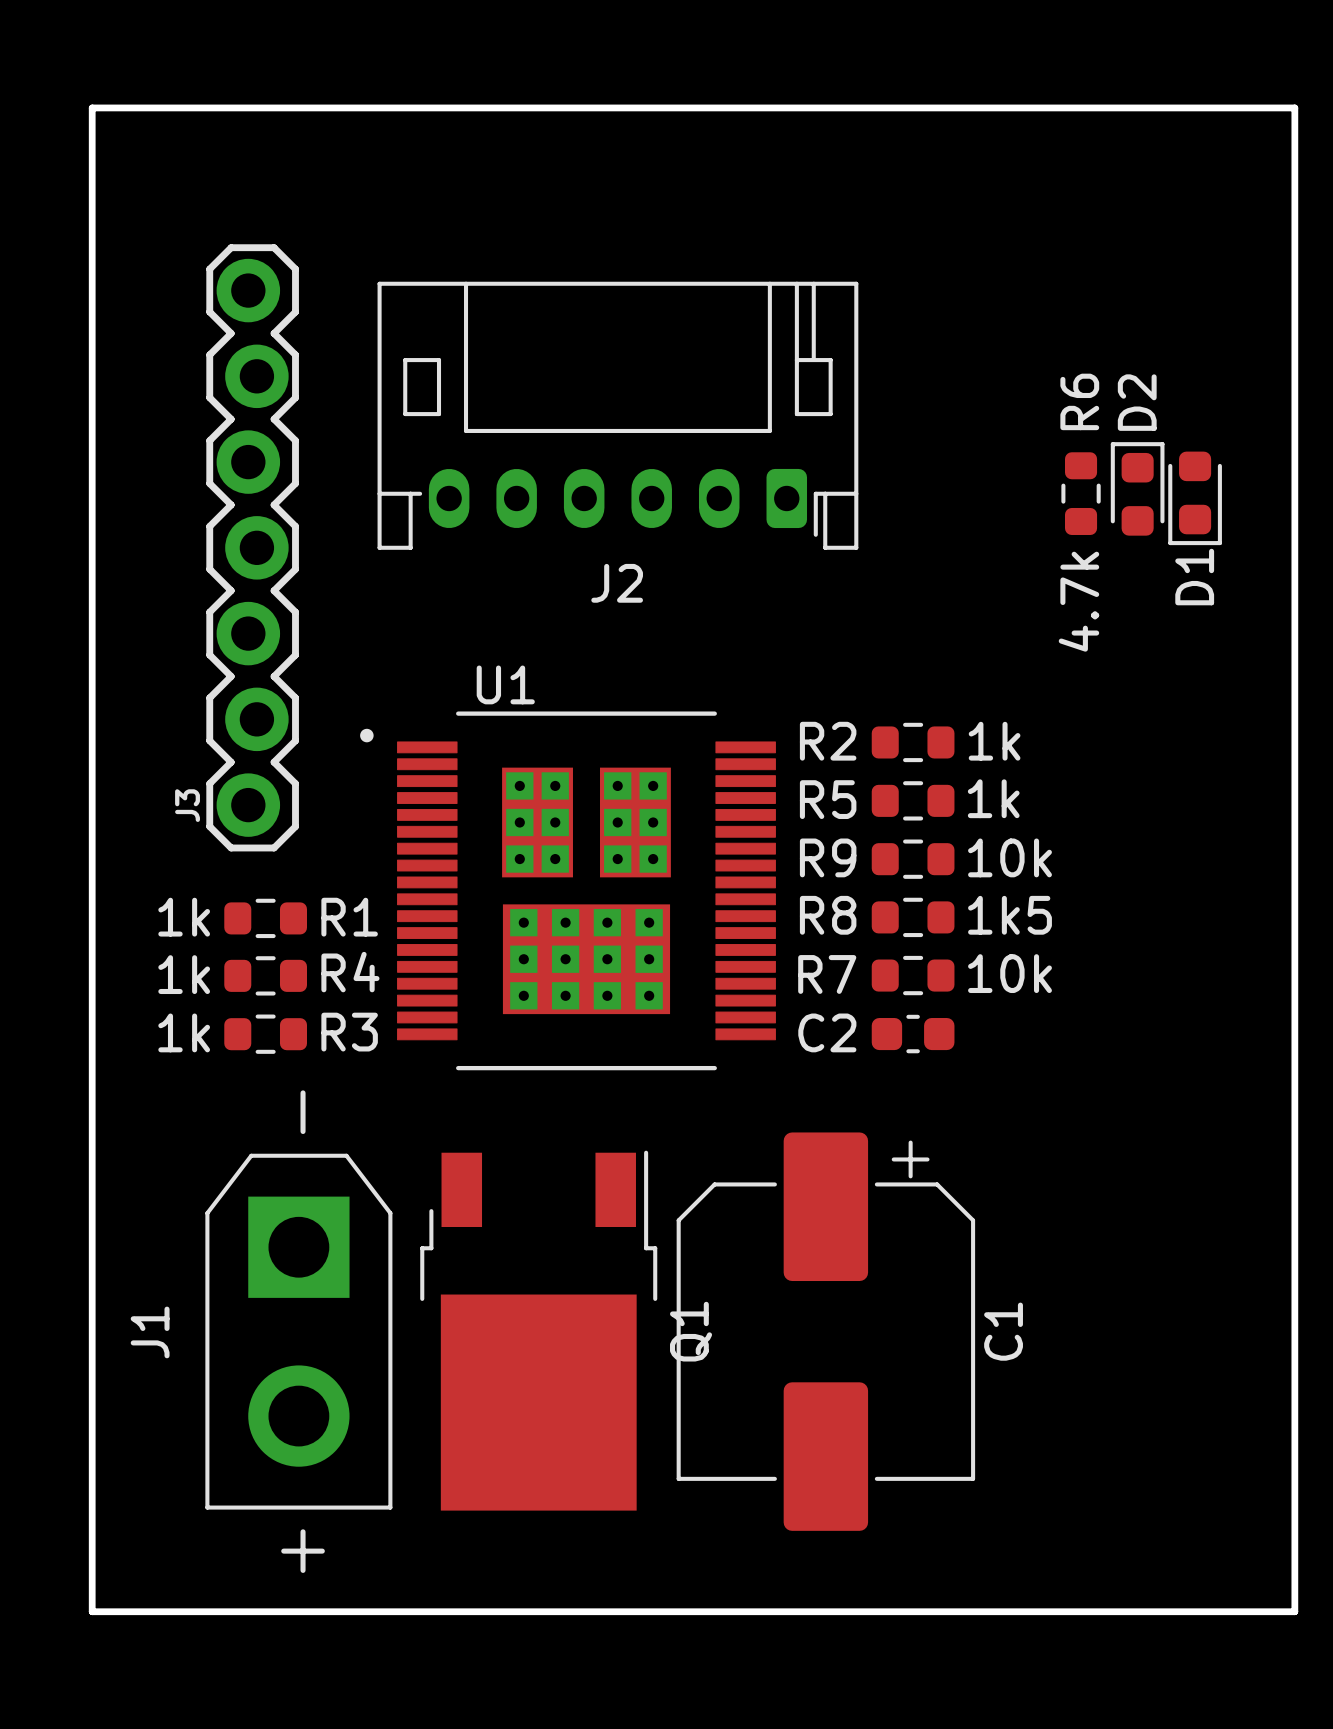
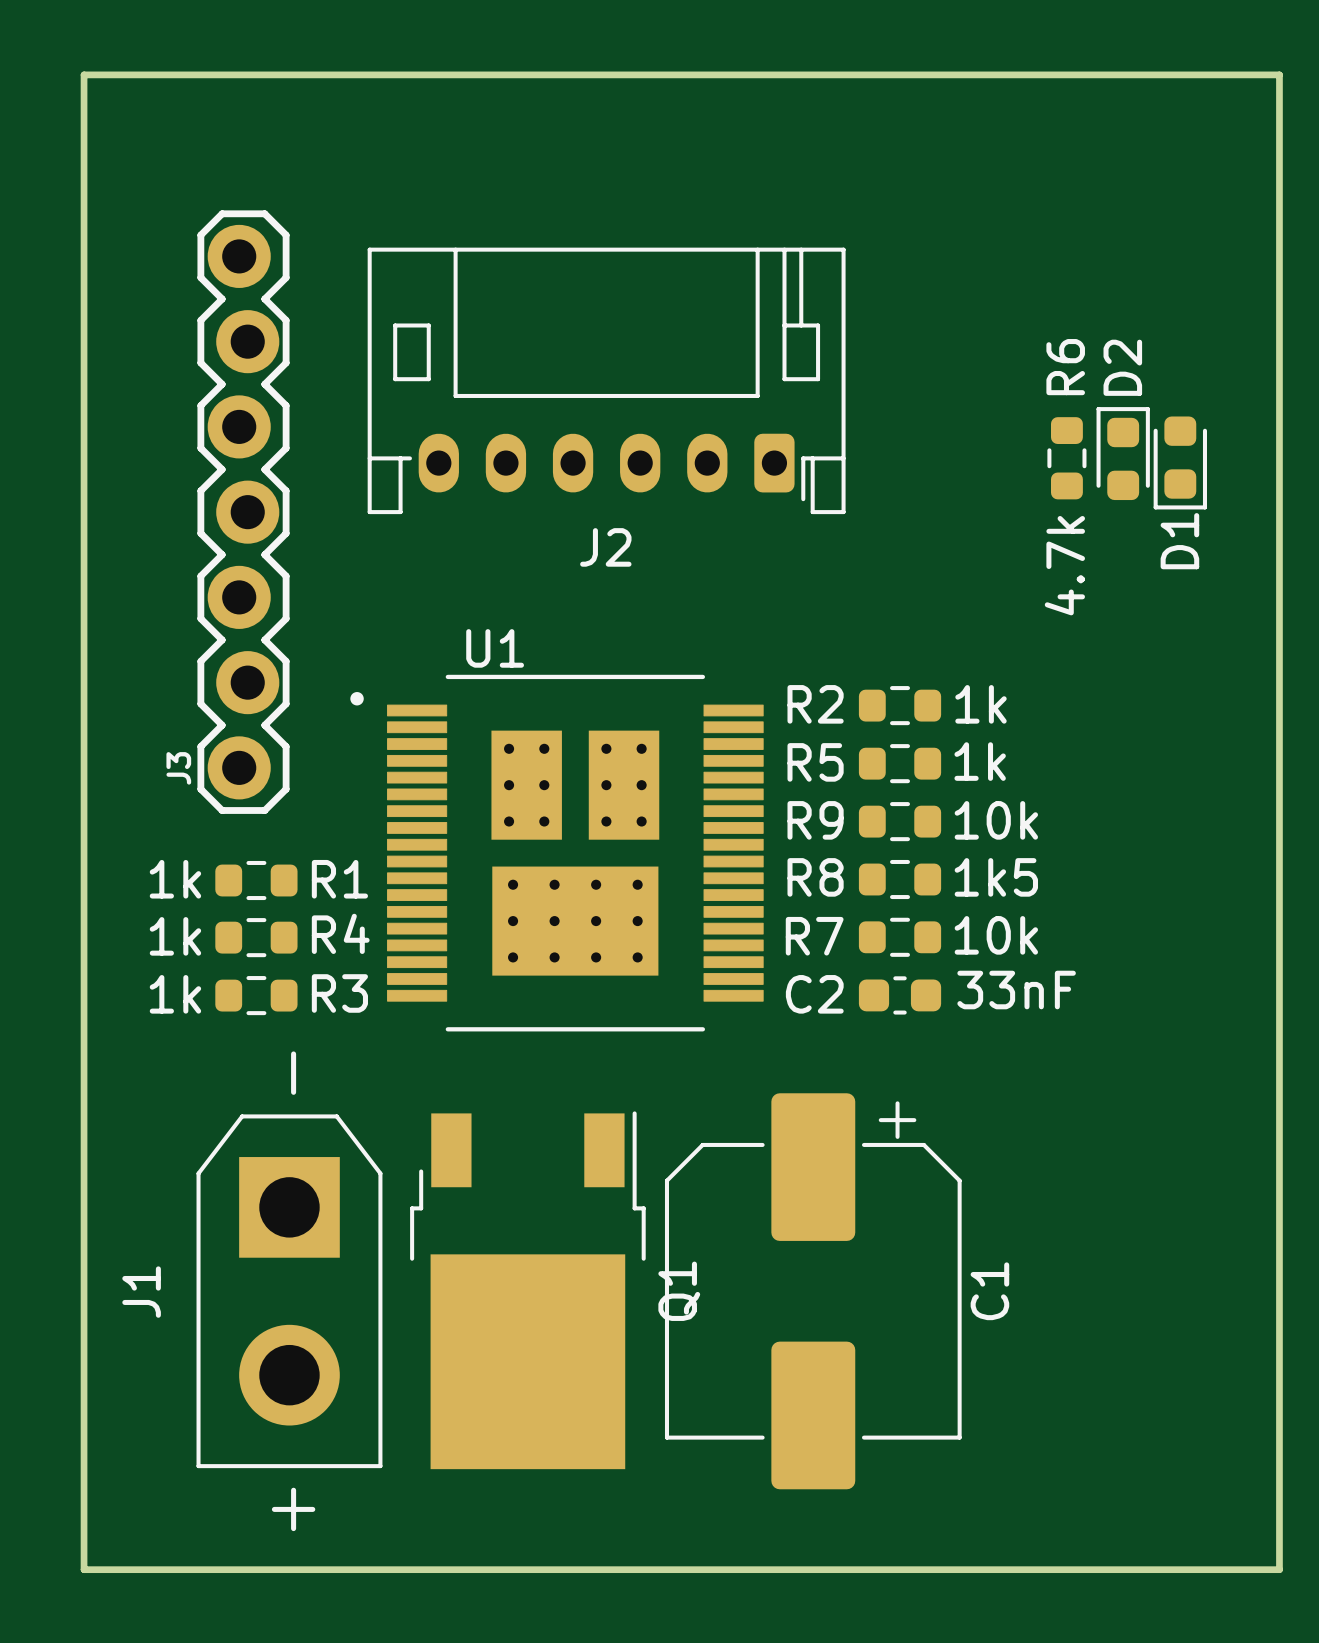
C2 value: none -> 33nF (1016, 990)

